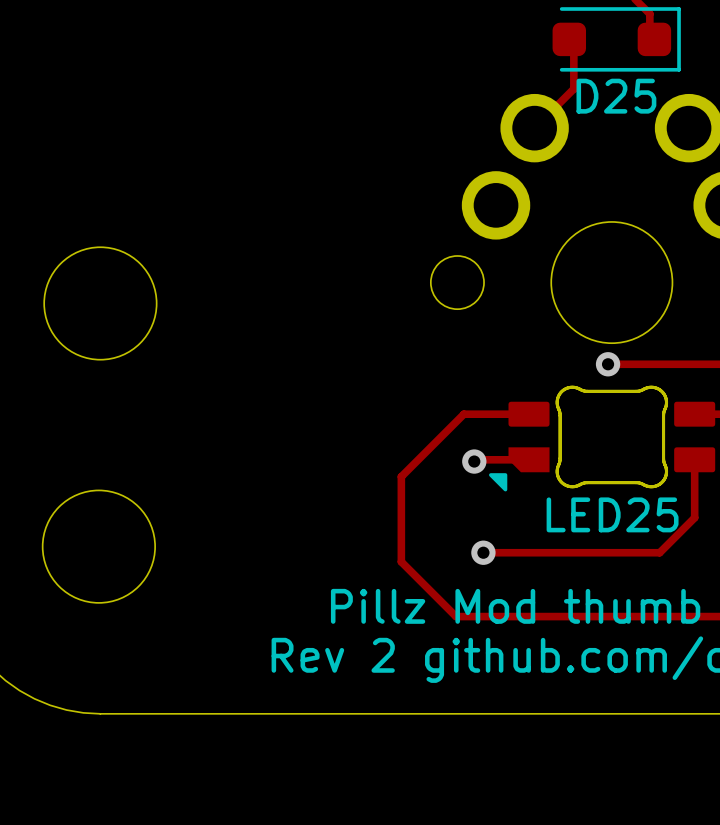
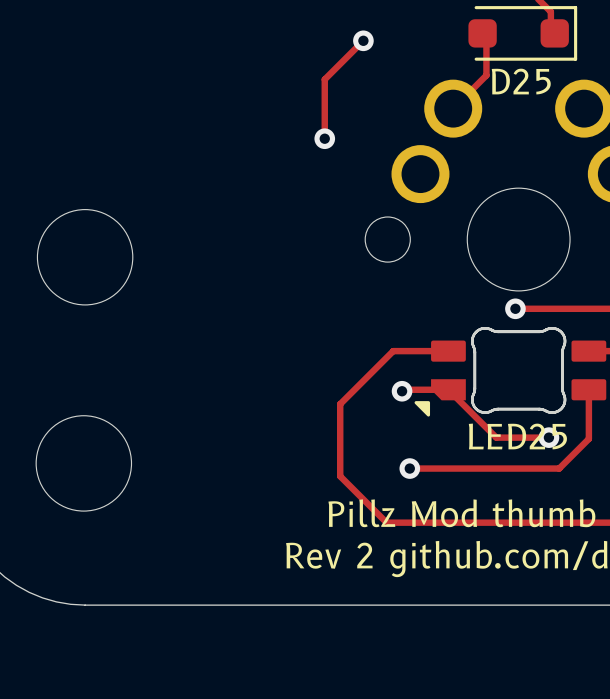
track: none -> (363, 40) (324, 79) (324, 138)
via: none -> (363, 40)
via: none -> (324, 138)
track: none -> (448, 389) (496, 437) (548, 437)
via: none -> (548, 437)

